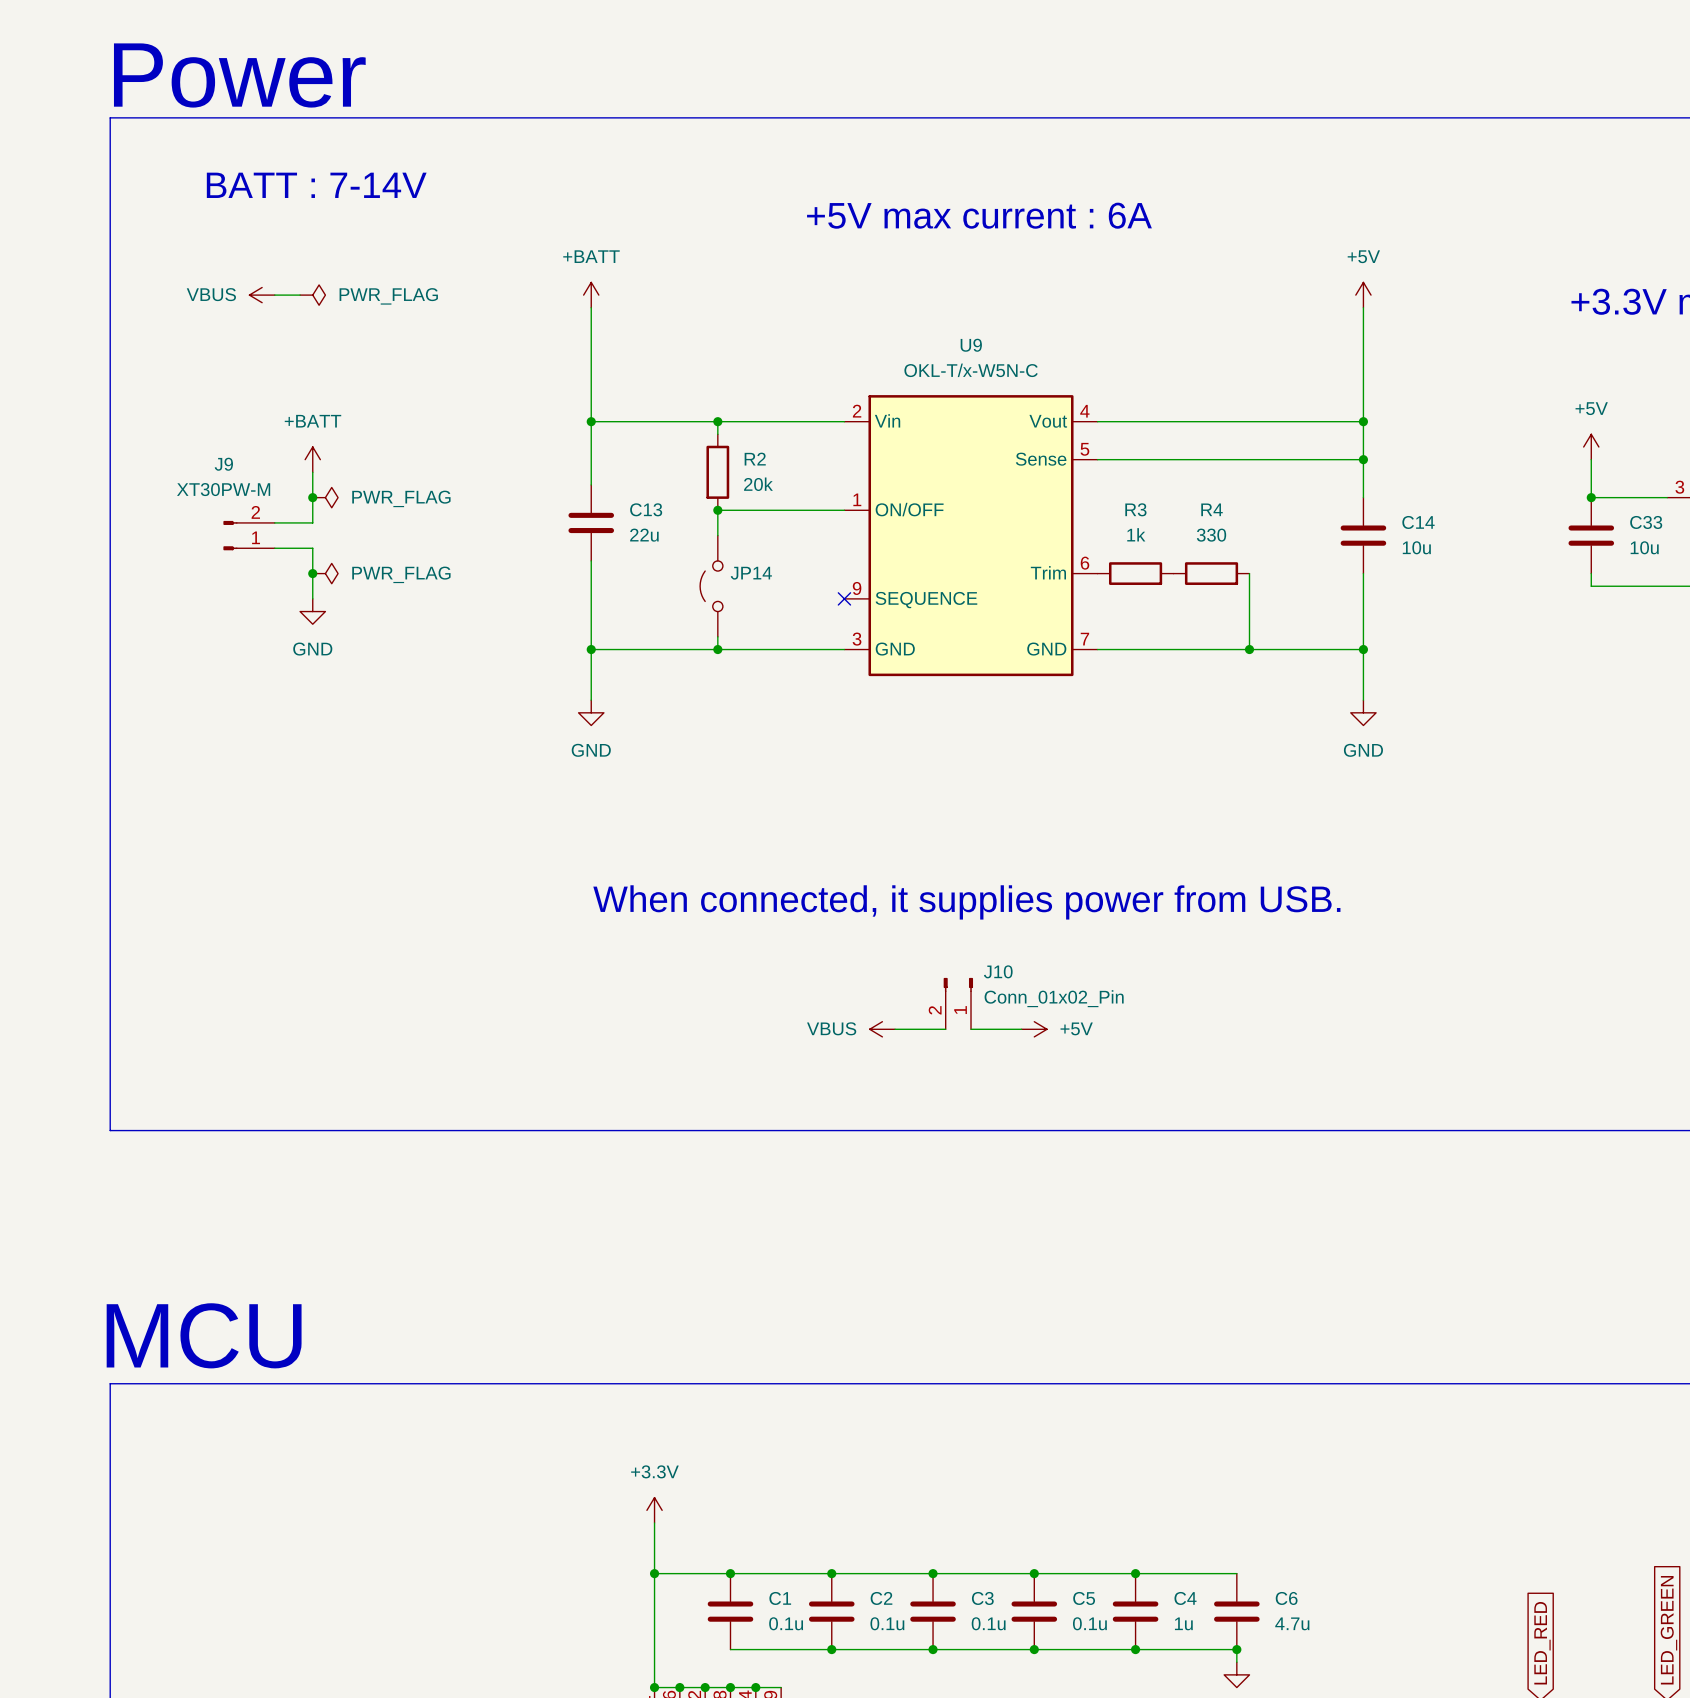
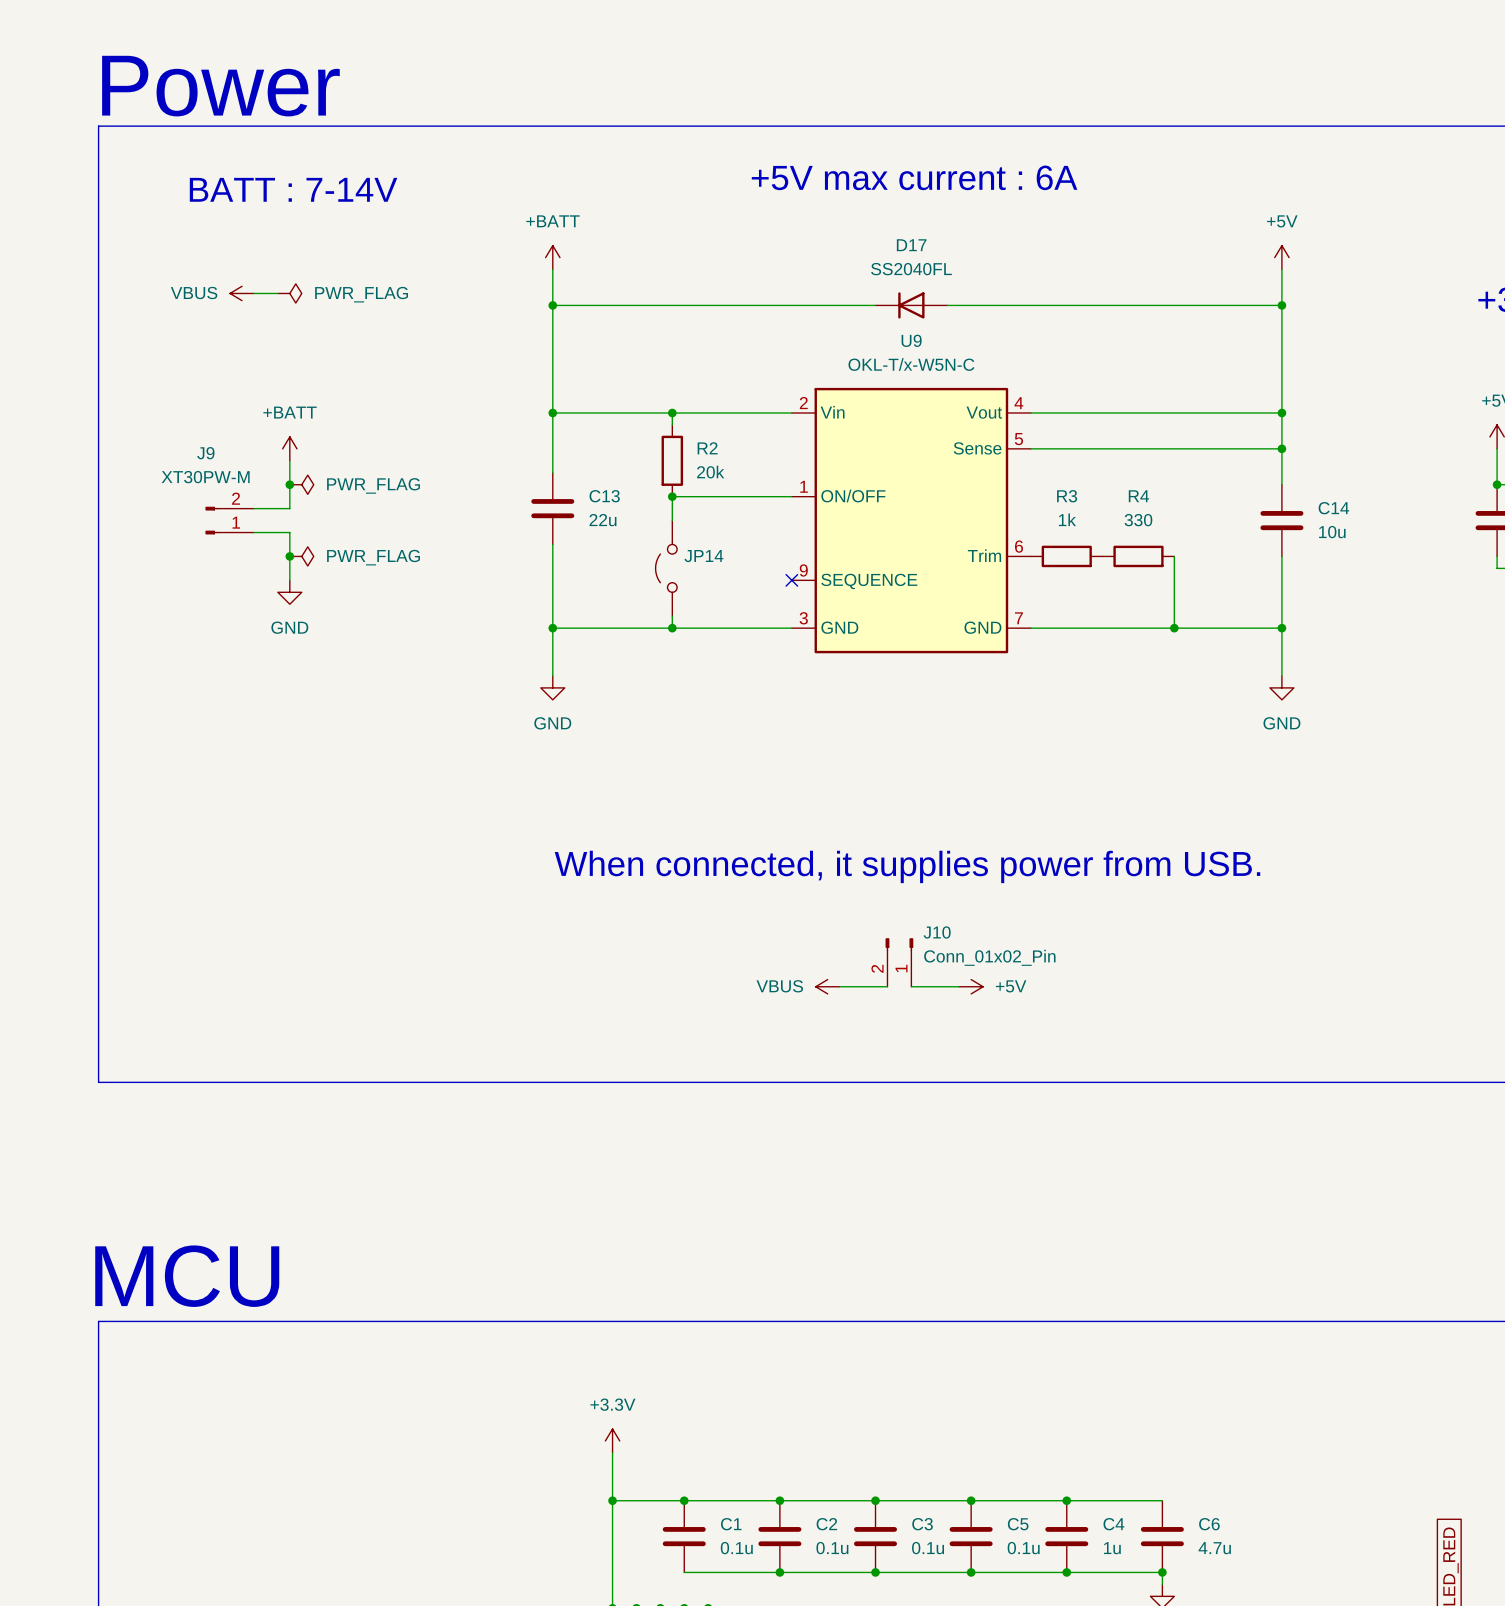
text position: +5V max current : 6A (979, 215) -> +5V max current : 6A (914, 177)
wire: none -> (552, 269) (552, 305) (875, 305)
wire: none -> (1281, 269) (1281, 305) (947, 305)
power symbol position: +BATT (591, 295) -> +BATT (552, 257)
power symbol position: +5V (1363, 295) -> +5V (1281, 257)
junction: none -> (552, 305)
D17: none -> SS2040FL (911, 305)
junction: none -> (1281, 305)

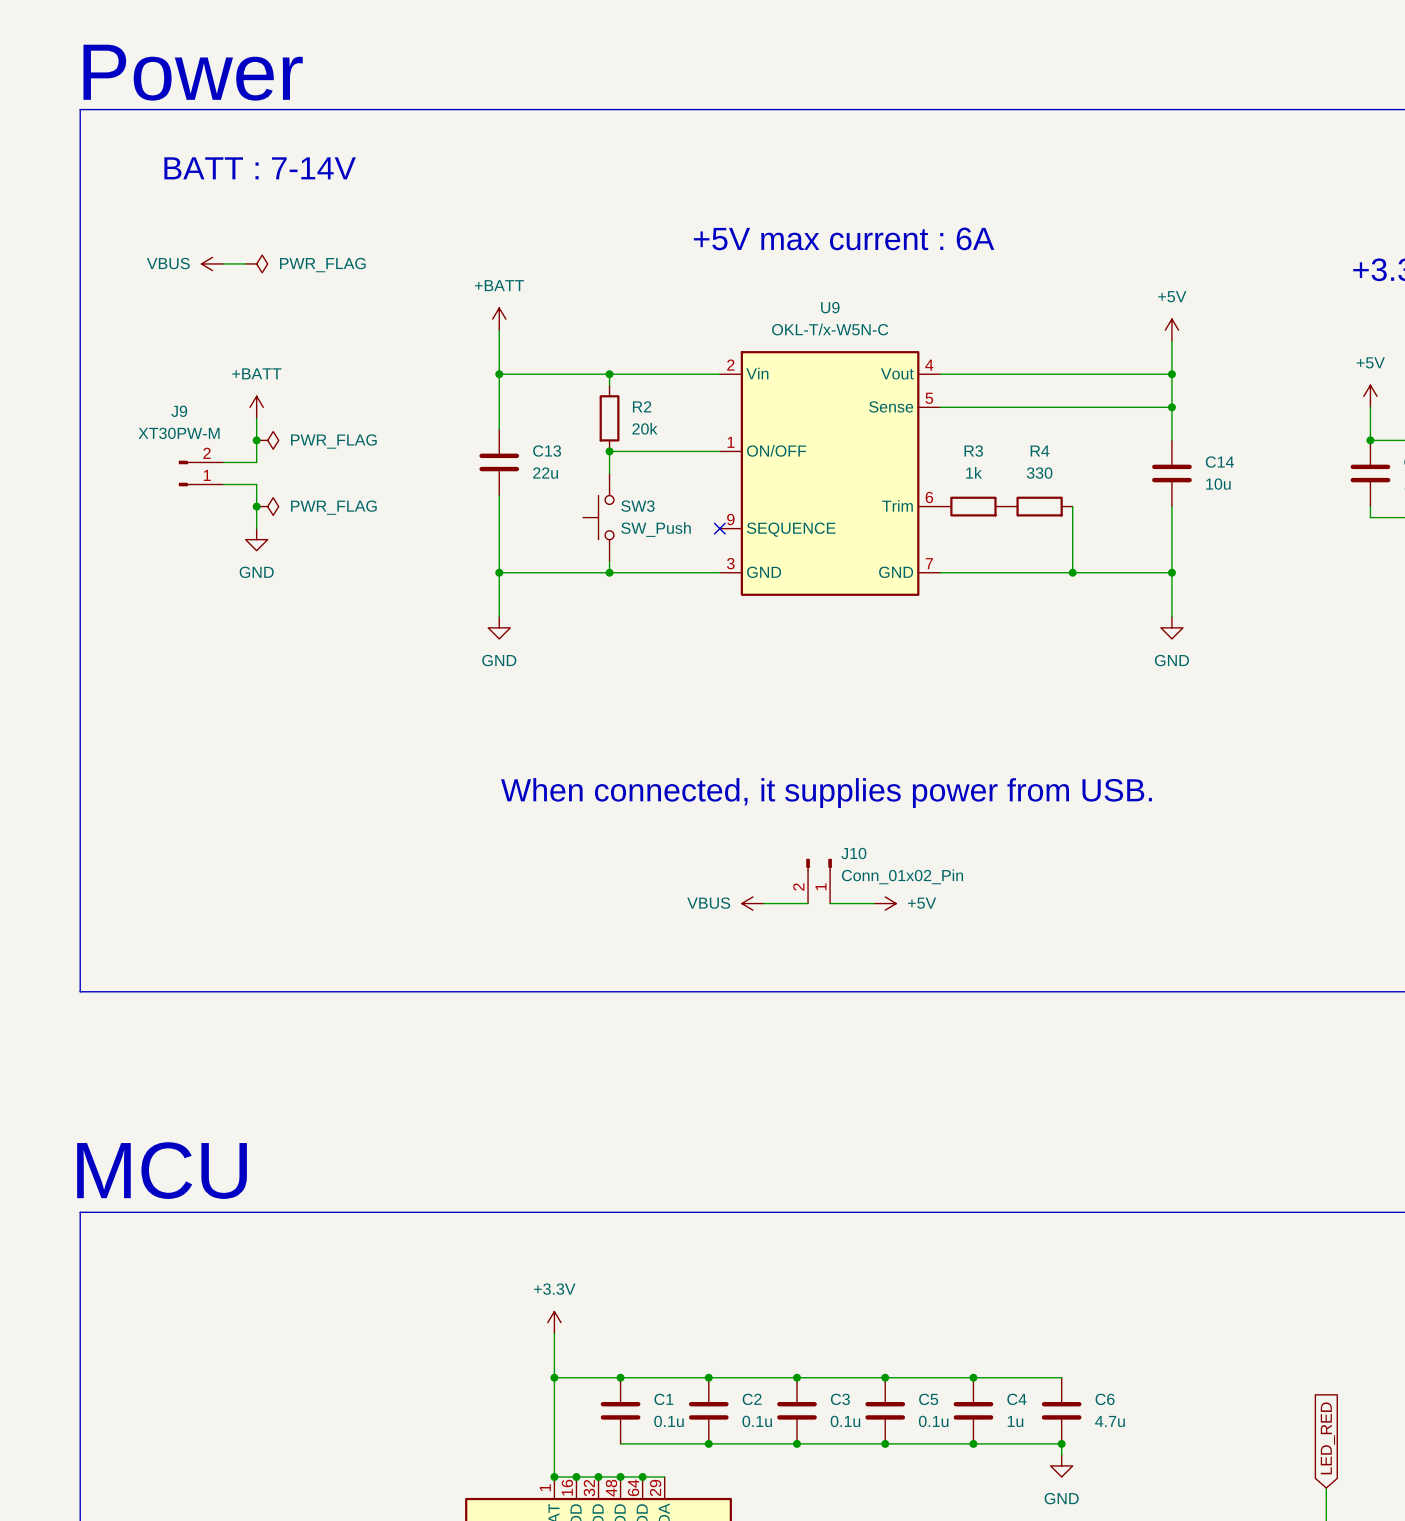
text position: +5V max current : 6A (914, 177) -> +5V max current : 6A (844, 238)
power symbol position: +BATT (552, 257) -> +BATT (499, 319)
power symbol position: +5V (1281, 257) -> +5V (1171, 330)
wire: (552, 269) (552, 365) -> none
wire: (1281, 269) (1281, 377) -> none
wire: (552, 305) (875, 305) -> none
junction: (552, 305) -> none
D17: SS2040FL (911, 305) -> none
wire: (947, 305) (1281, 305) -> none
junction: (1281, 305) -> none
SW3: none -> SW_Push (598, 517)
JP14: (666, 568) -> none

